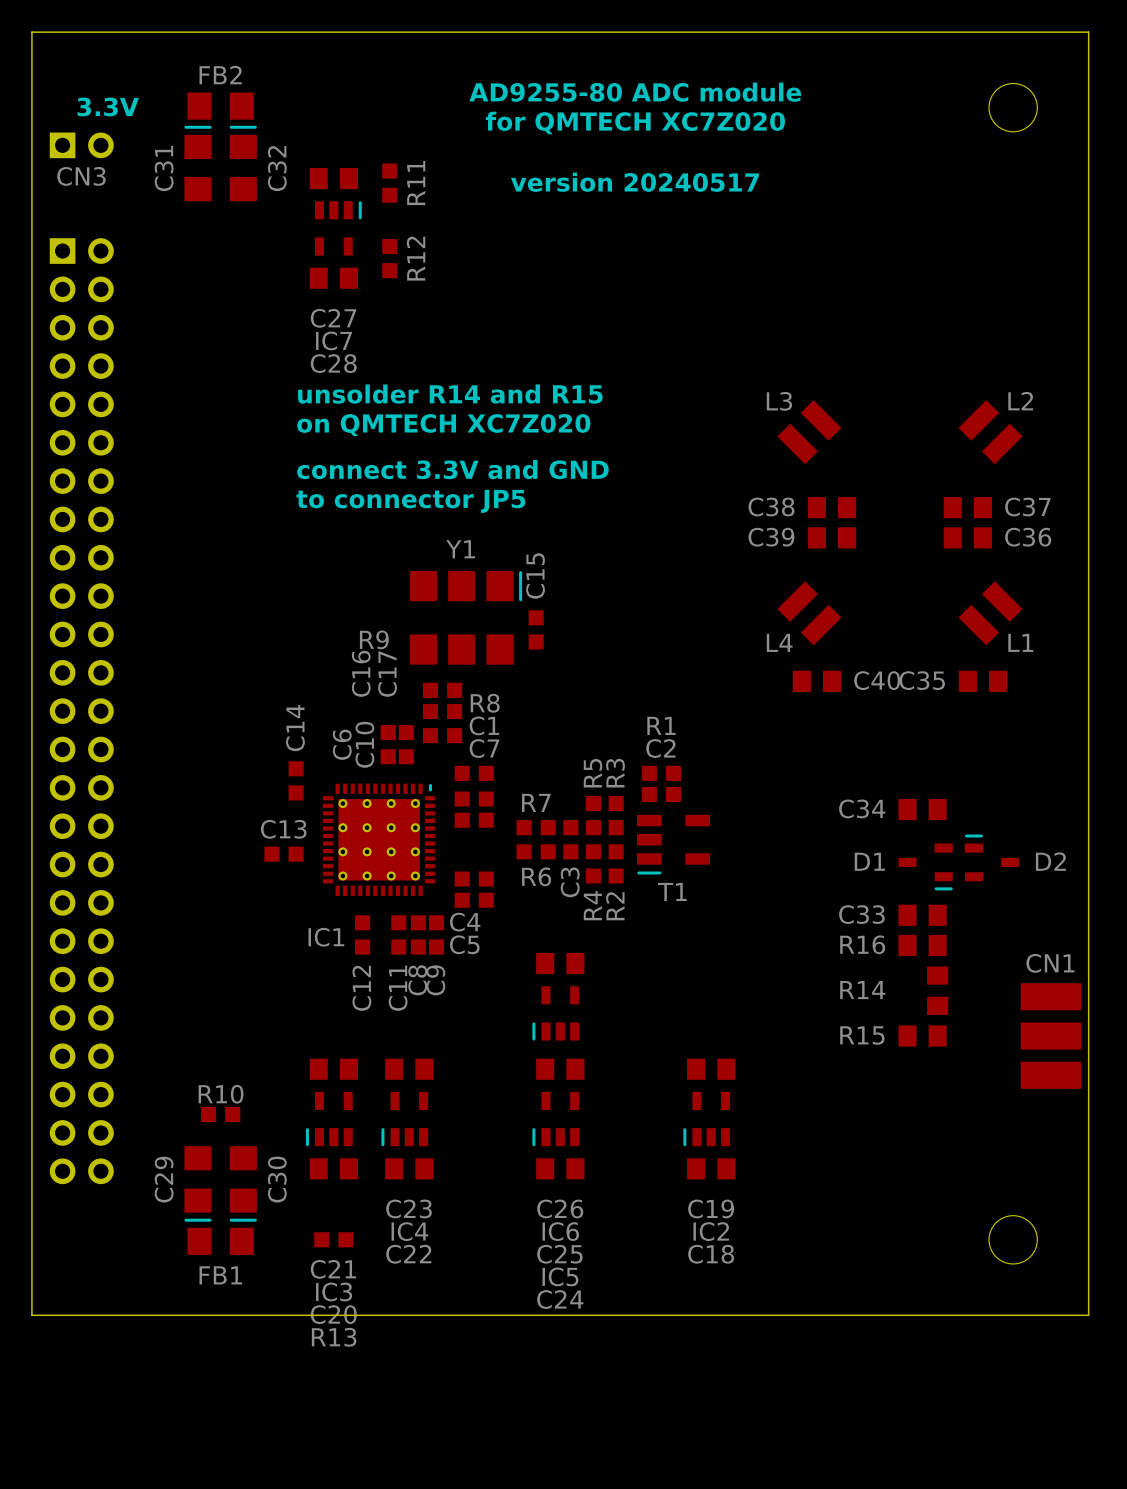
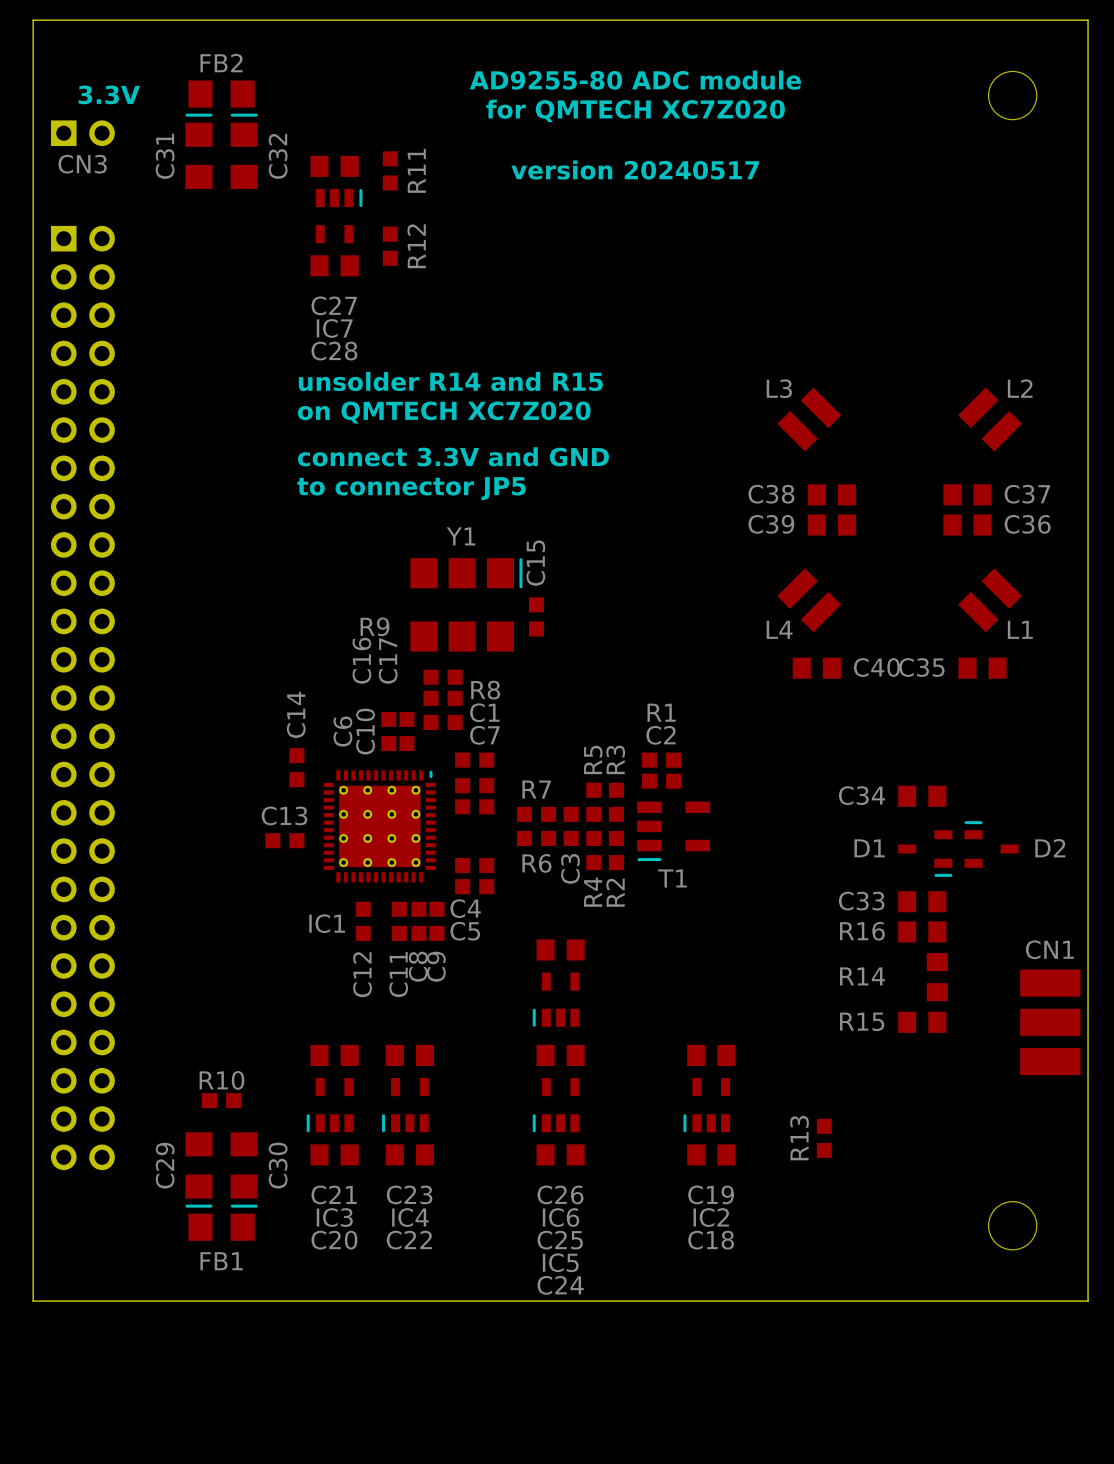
R13 rotation: 0° (333, 1239) -> 90° clockwise (824, 1138)
R13 position: (333, 1239) -> (824, 1138)
C21 name position: C21 (333, 1269) -> C21 (334, 1194)
IC3 name position: IC3 (334, 1291) -> IC3 (334, 1217)
C20 name position: C20 (333, 1314) -> C20 (334, 1240)
R13 name position: R13 (334, 1337) -> R13 (799, 1138)

